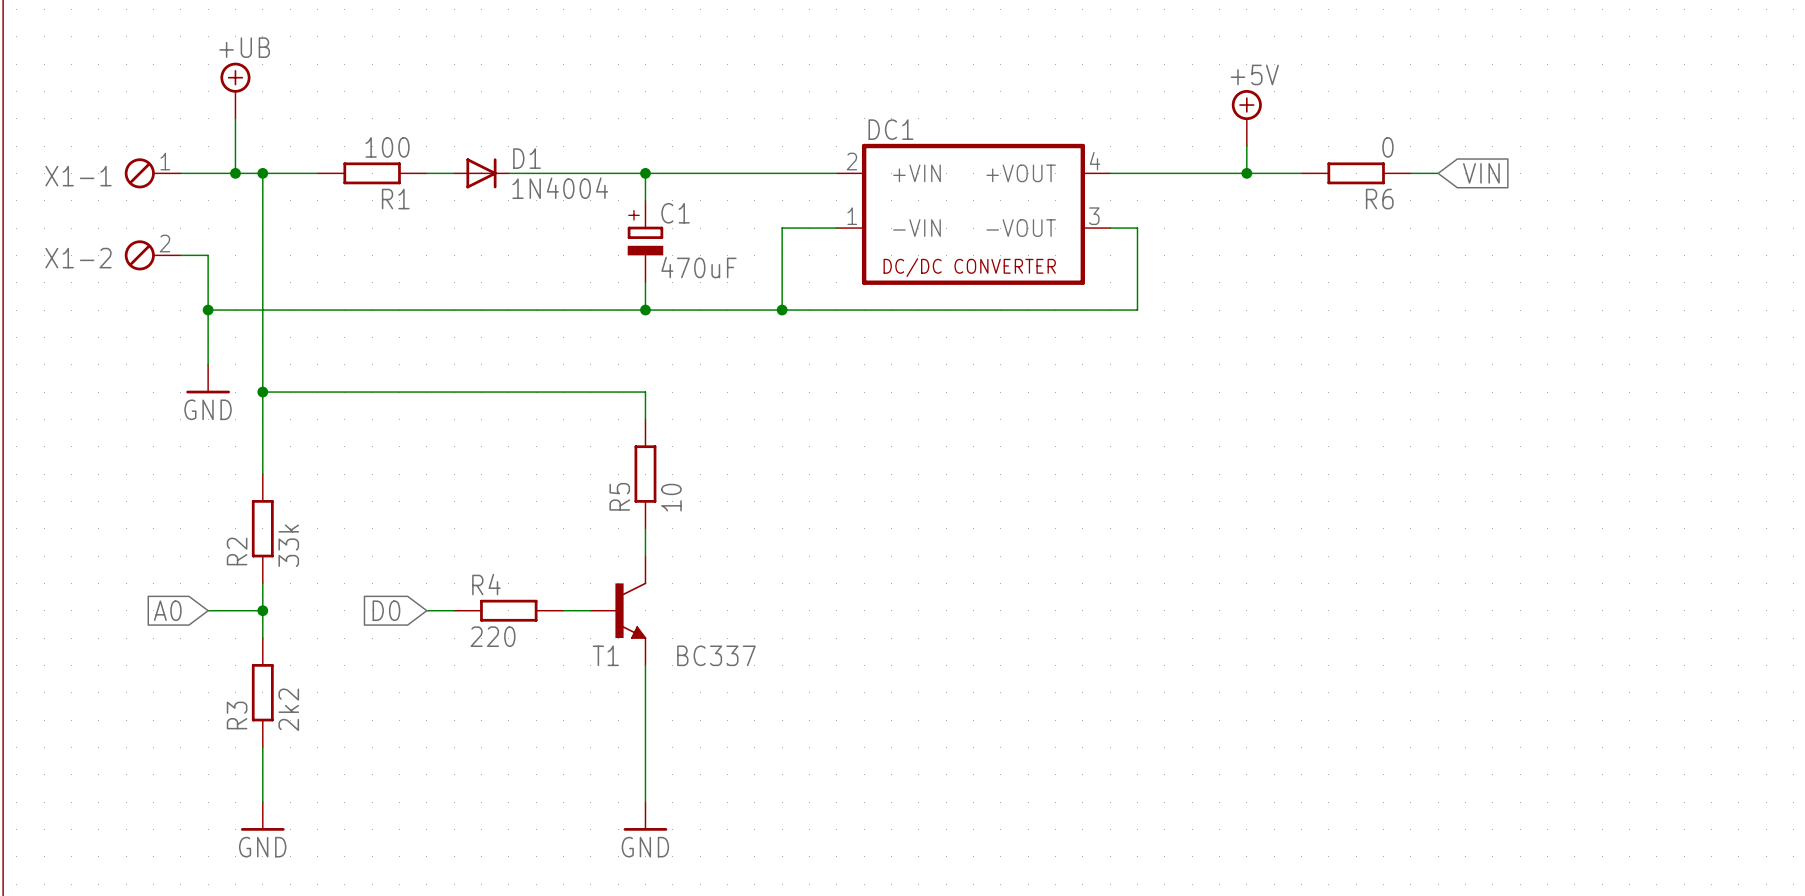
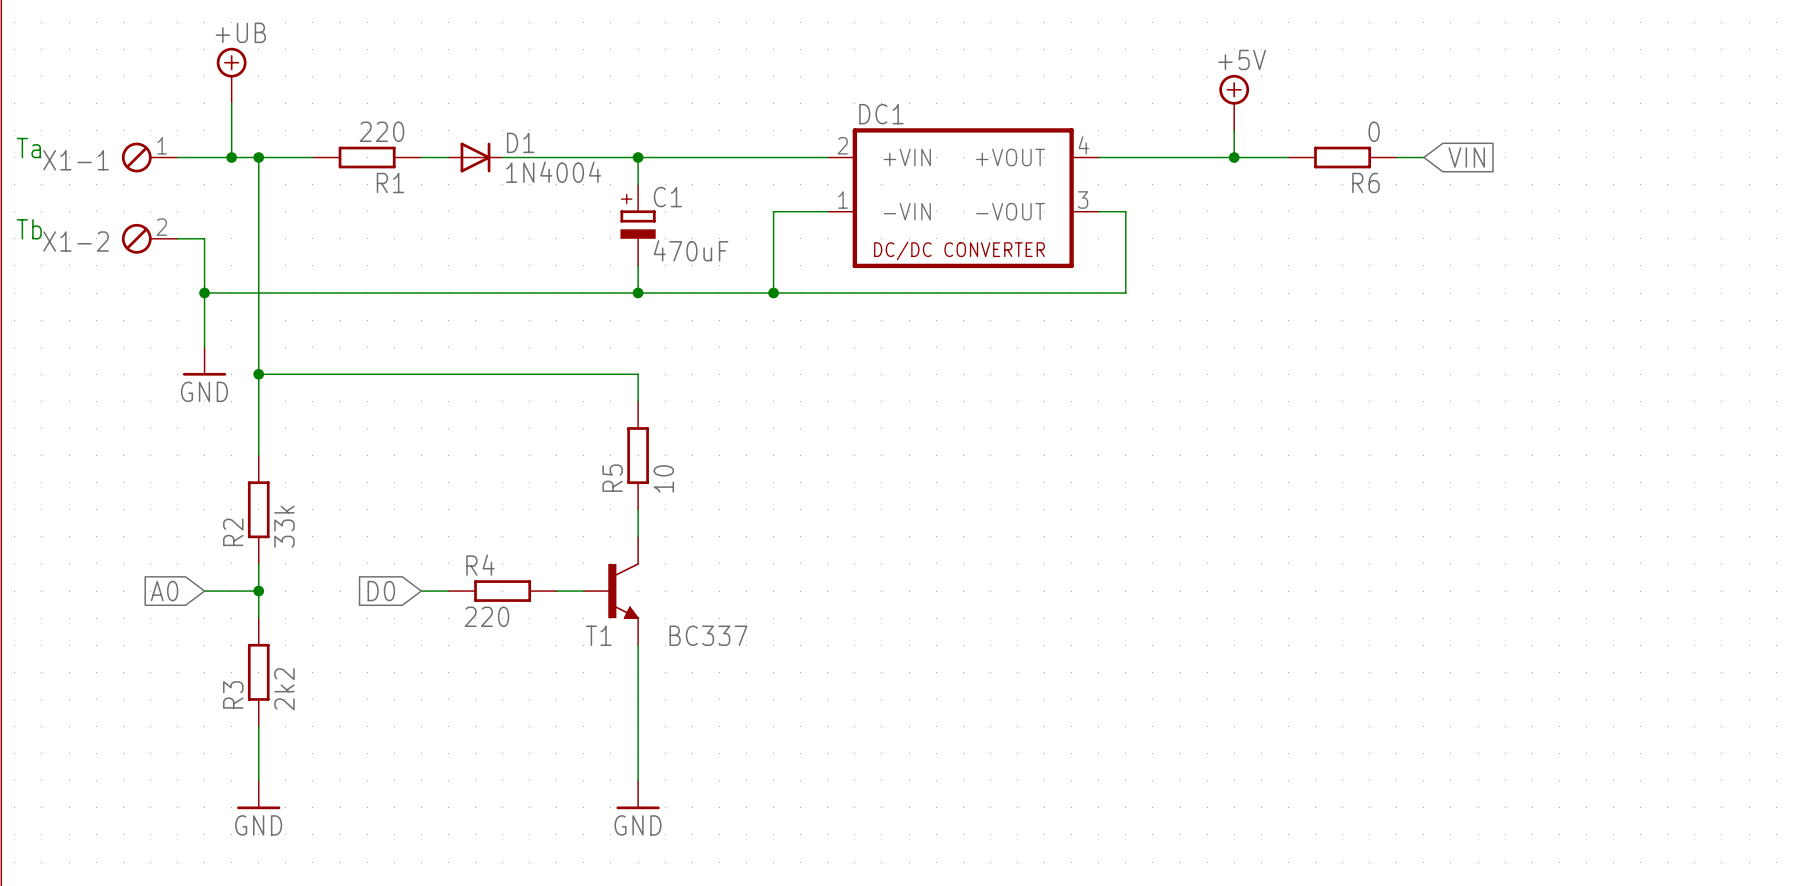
R1 value: 100 (387, 147) -> 220 (381, 131)
text: none -> Ta (28, 148)
text: none -> Tb (29, 229)

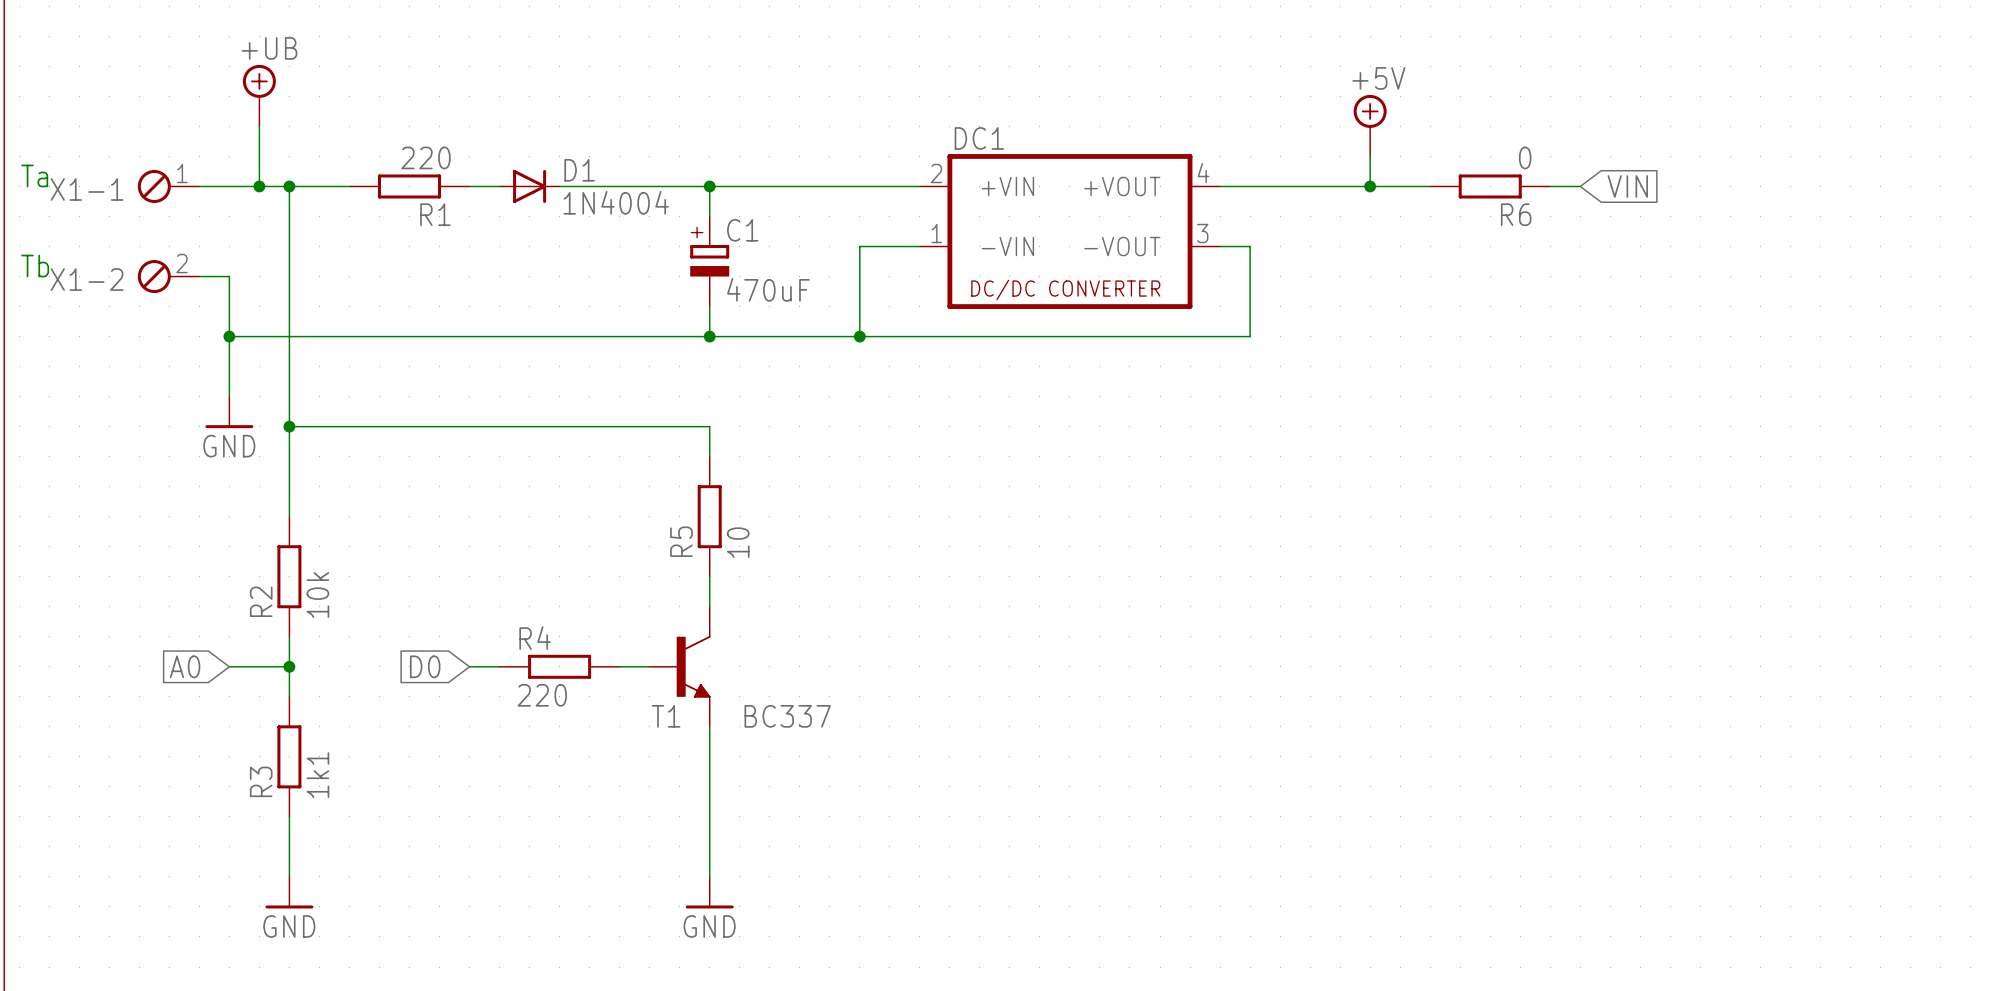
R2 value: 33k (284, 526) -> 10k (317, 595)
R3 value: 2k2 (284, 689) -> 1k1 (317, 775)

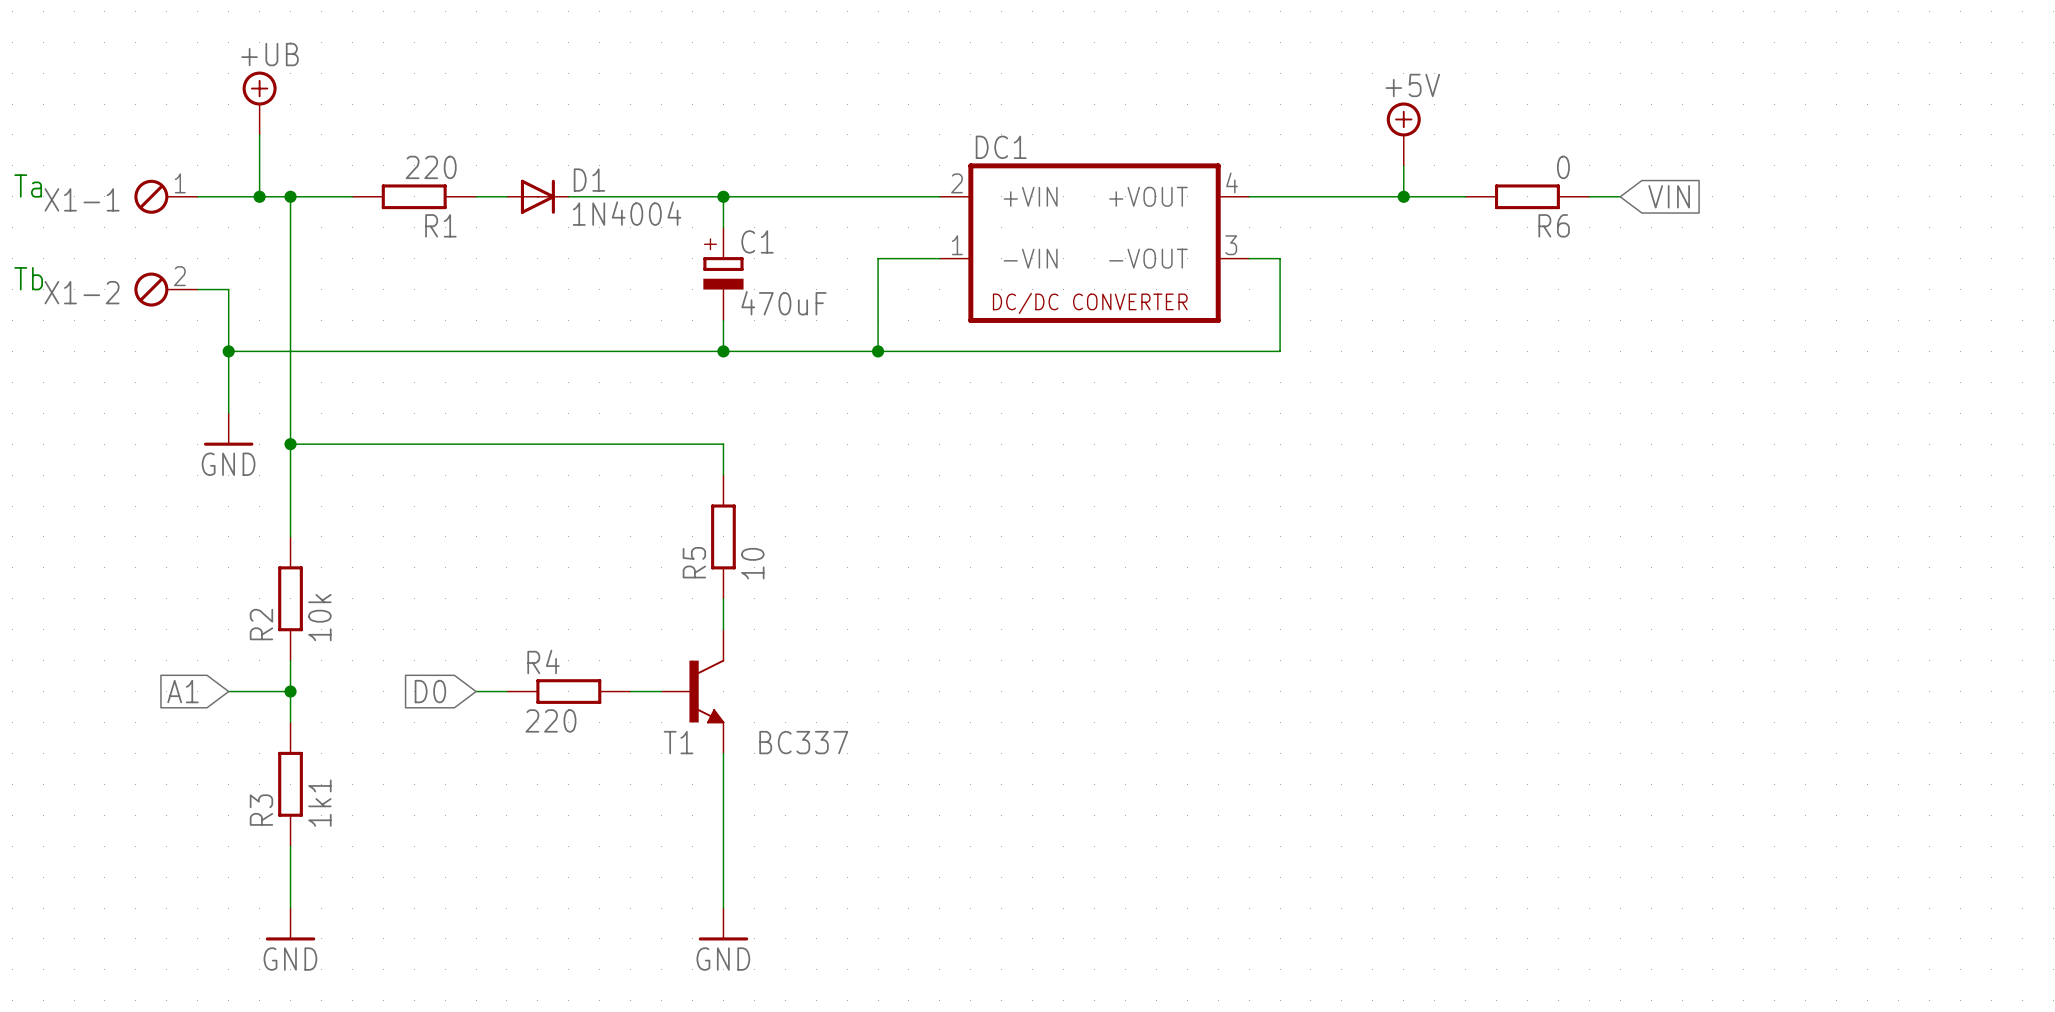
global label: A0 (185, 666) -> A1 (183, 691)

